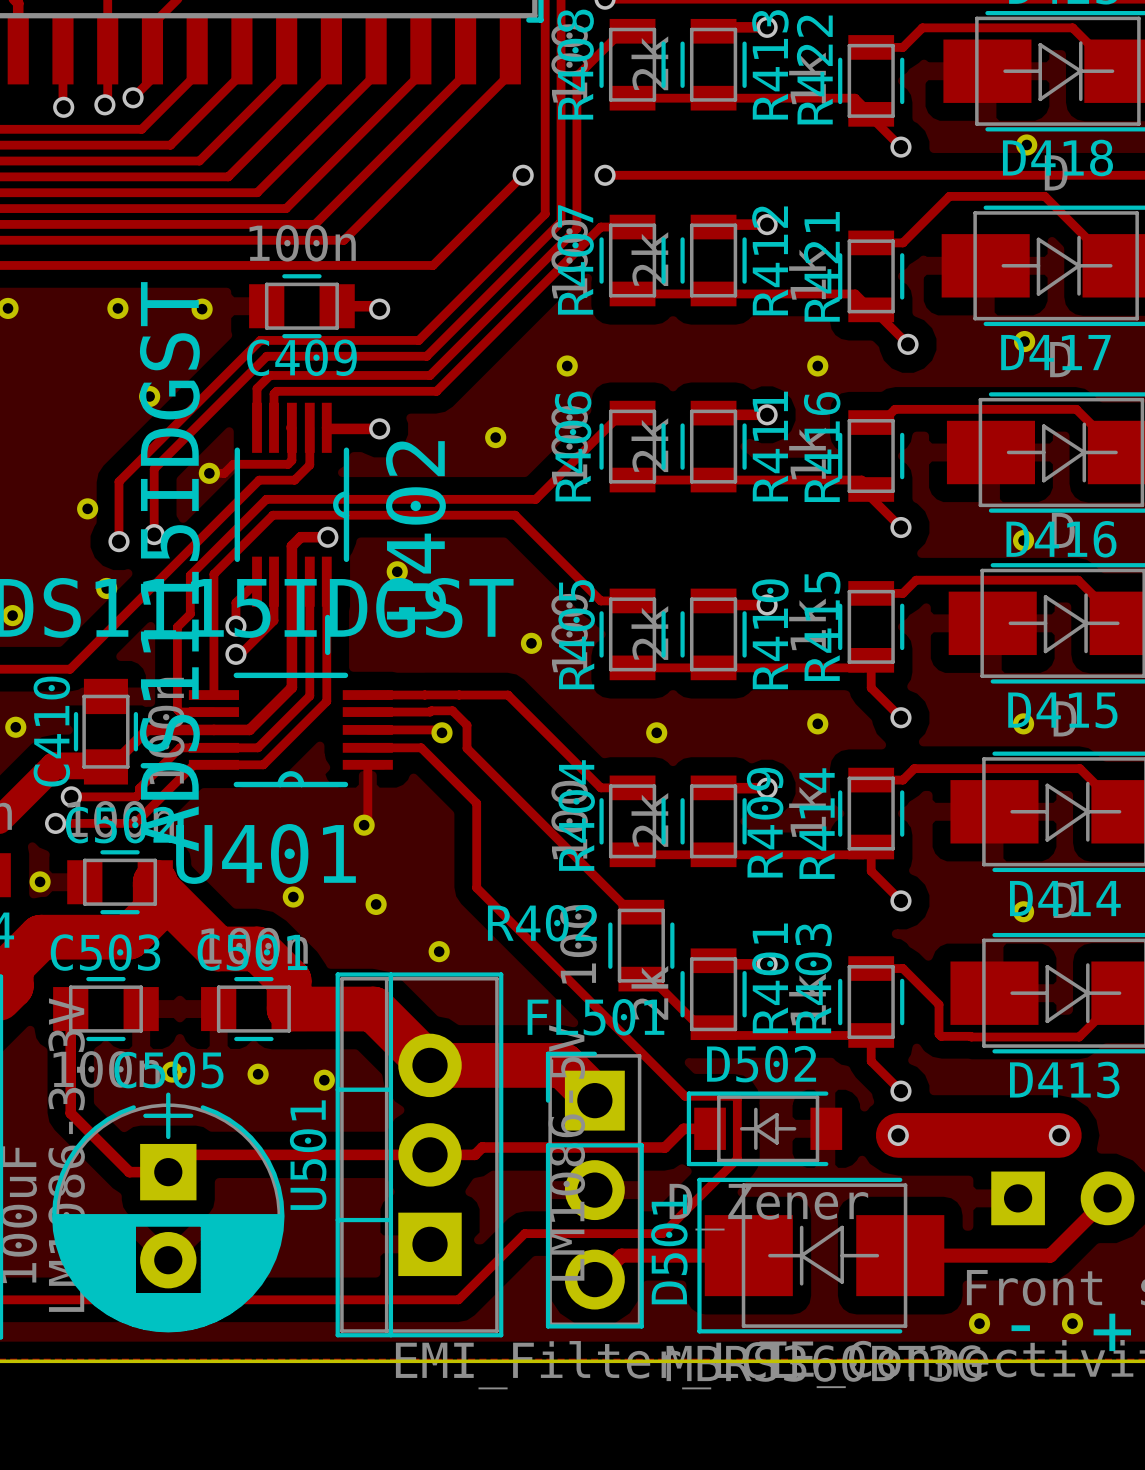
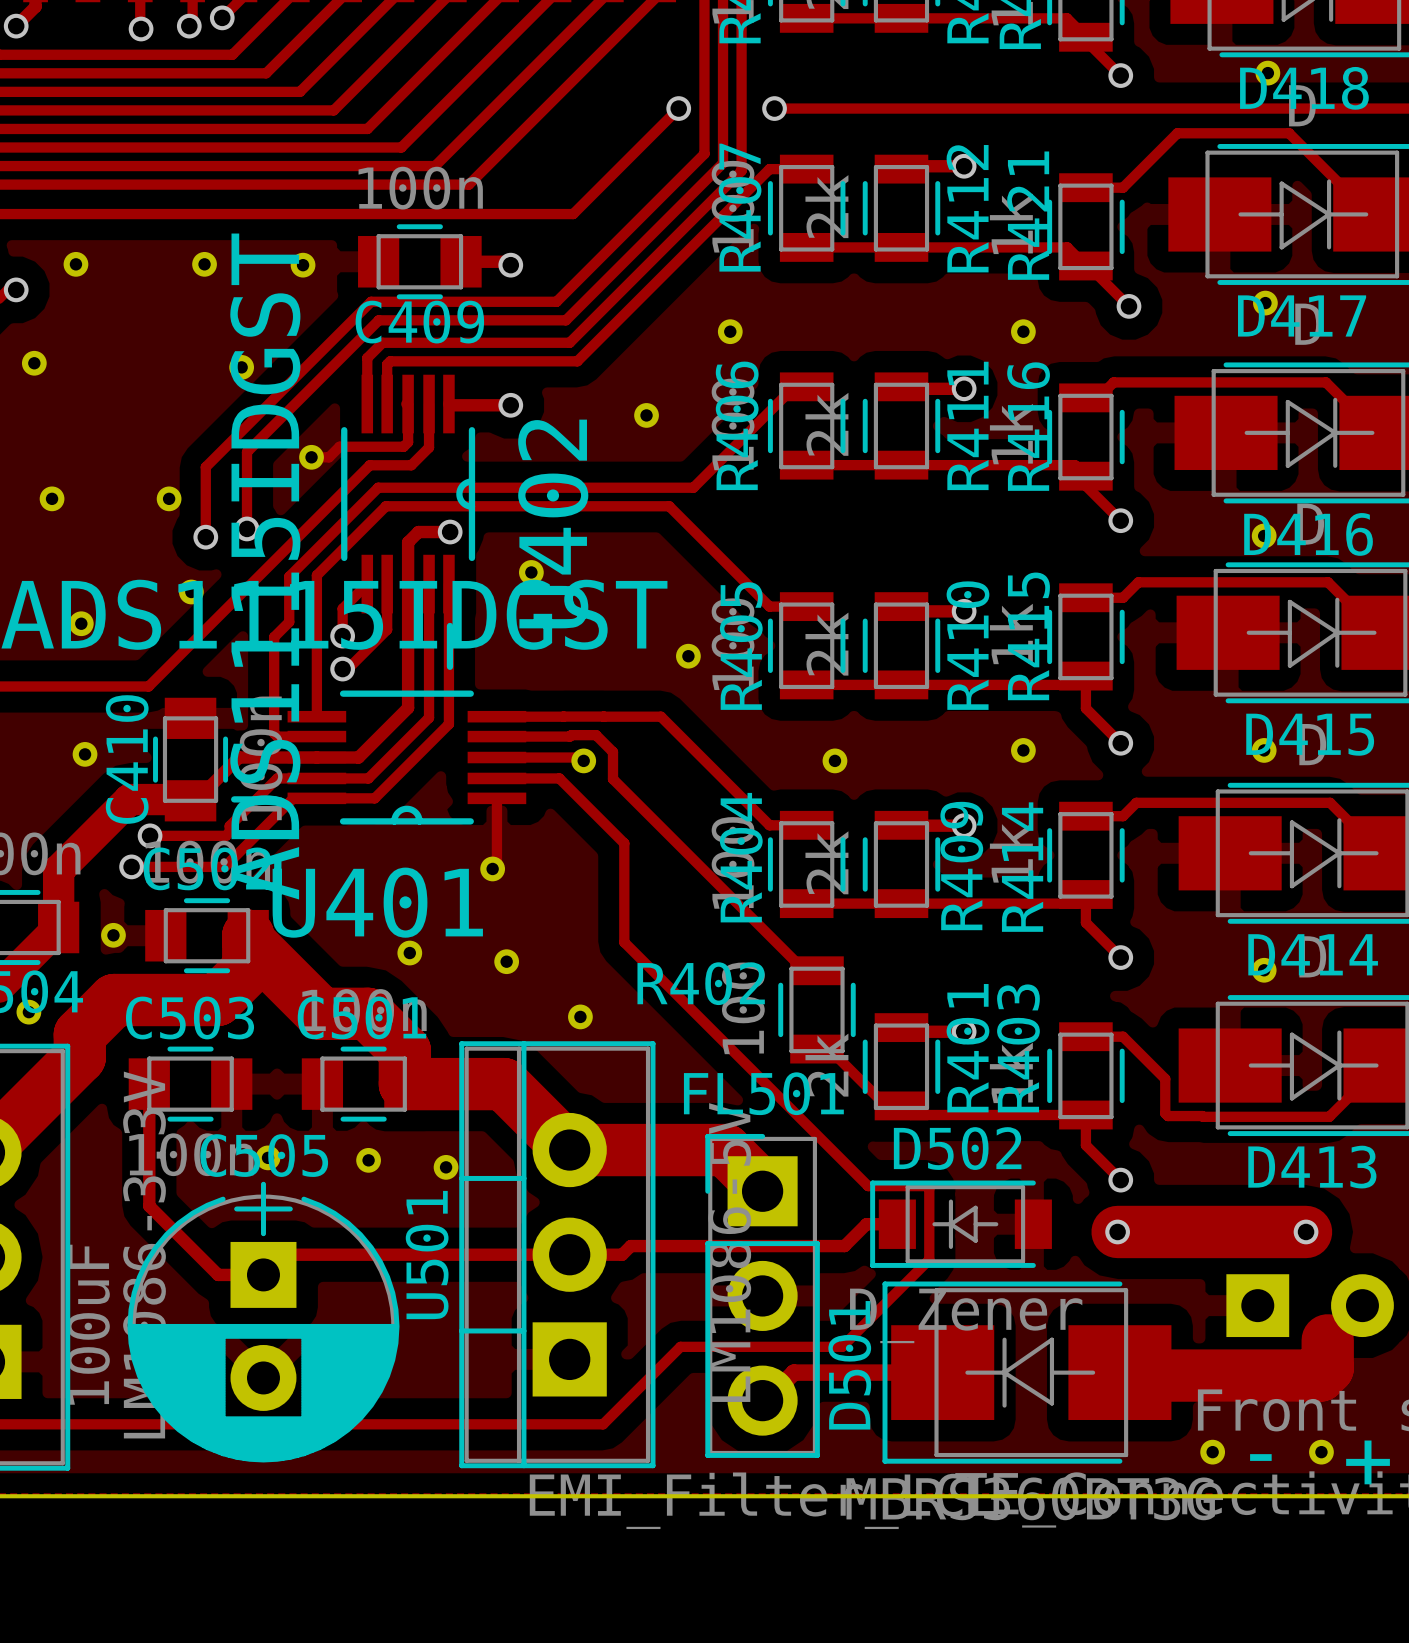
track: (1077, 1228) (1050, 1255) (900, 1255) -> (1327, 1340) (1327, 1367) (1320, 1375) (1122, 1375) (1119, 1372)

